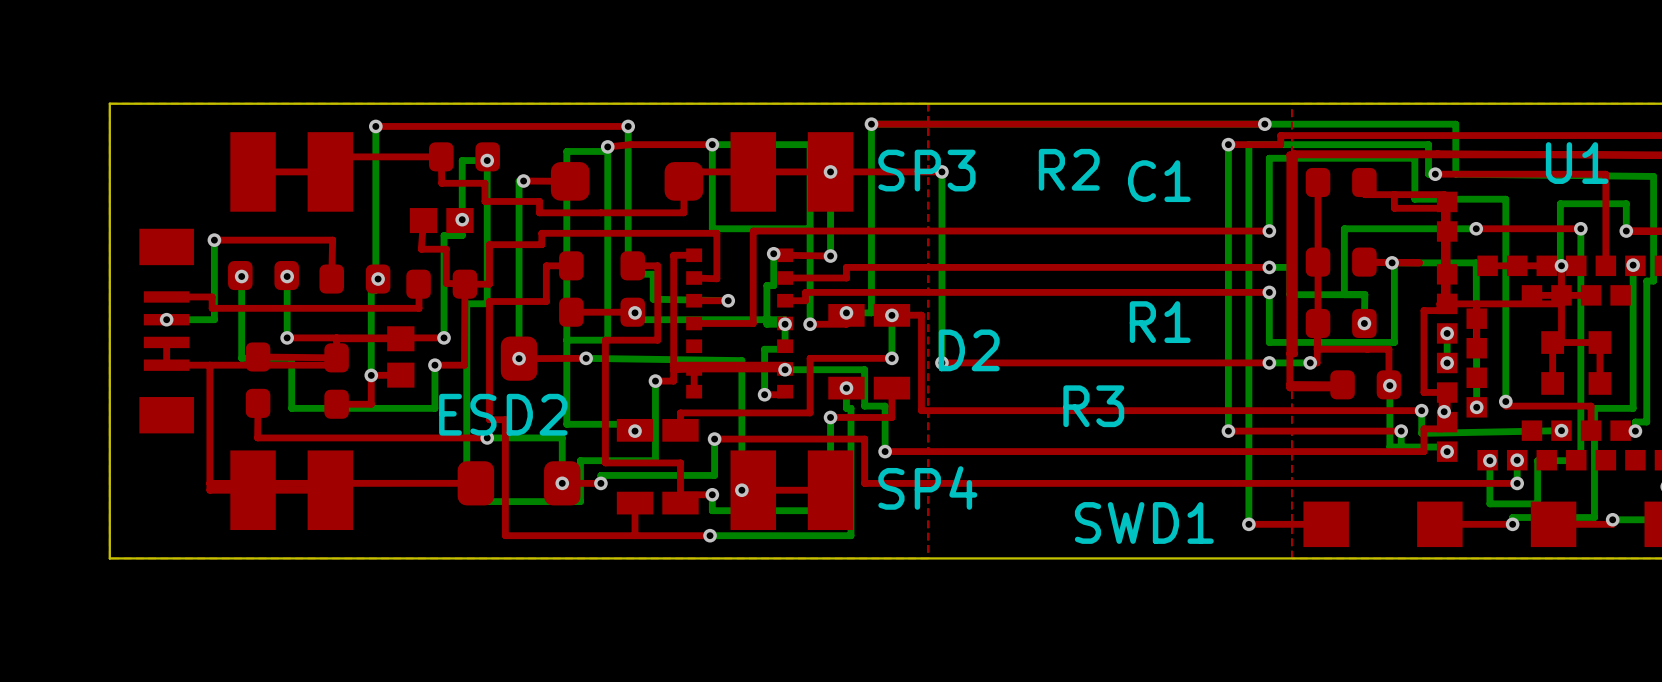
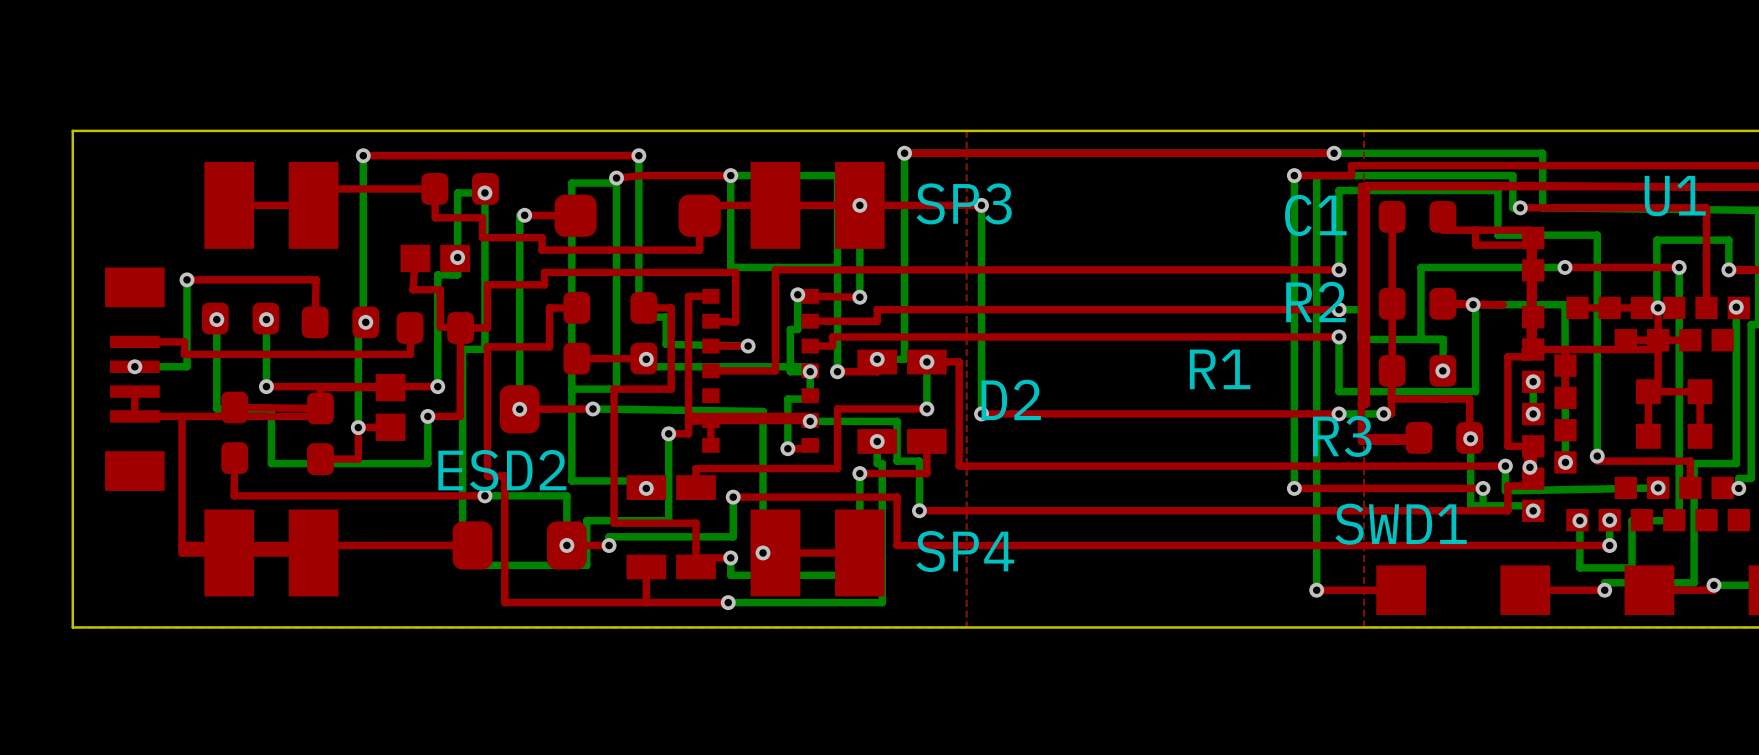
R2 name position: R2 (1069, 169) -> R2 (1315, 302)
C1 name position: C1 (1159, 181) -> C1 (1315, 215)
R3 name position: R3 (1093, 406) -> R3 (1342, 436)
SWD1 name position: SWD1 (1144, 522) -> SWD1 (1401, 524)

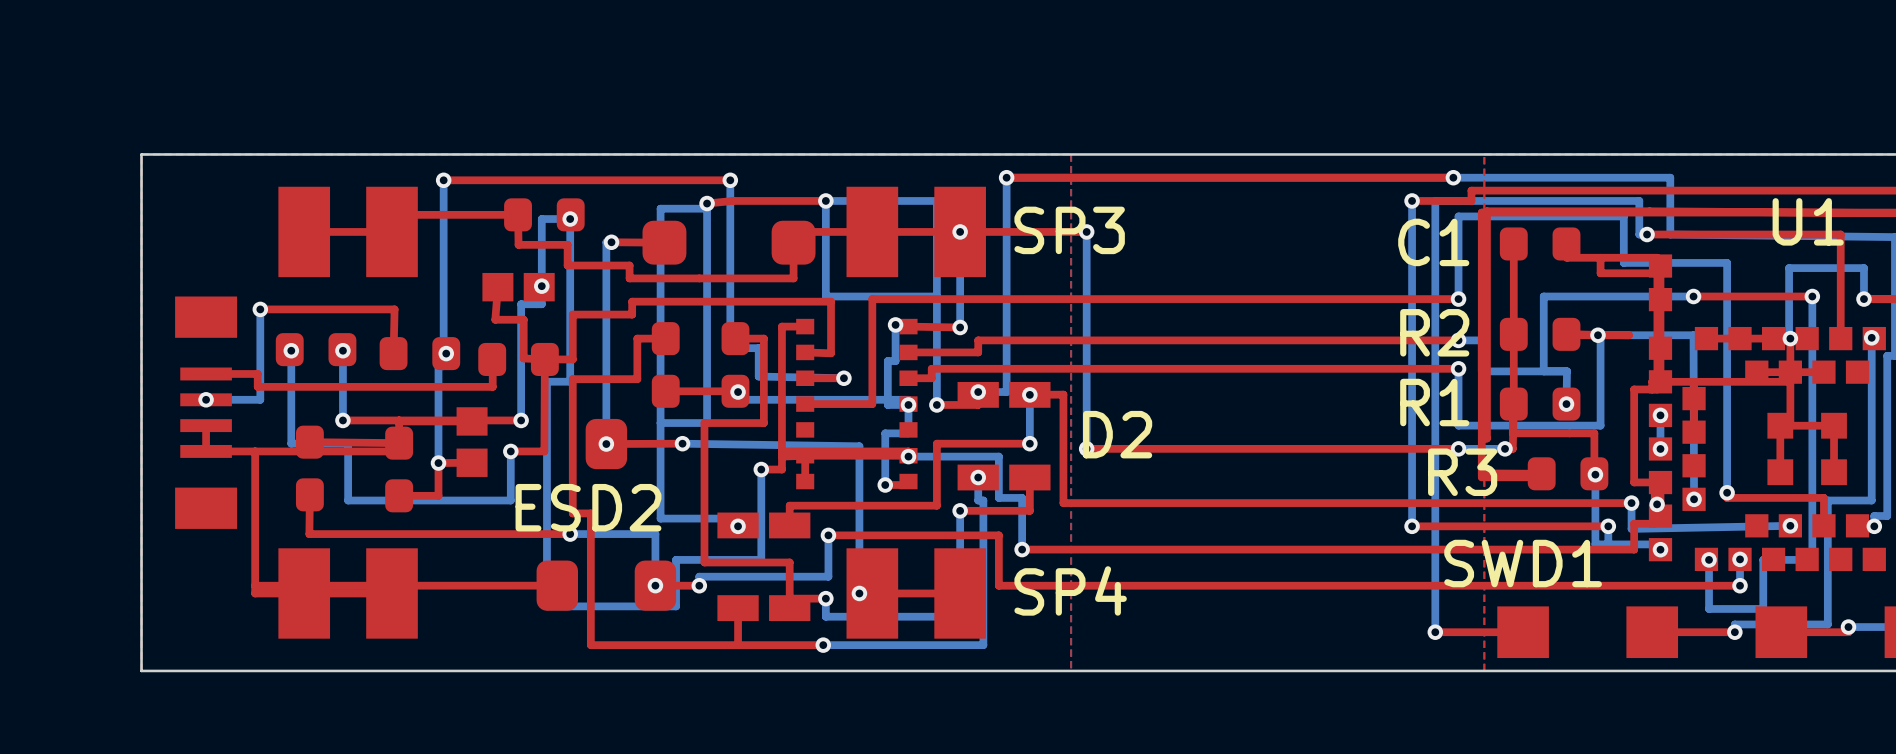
R1 name position: R1 (1220, 369) -> R1 (1434, 402)

